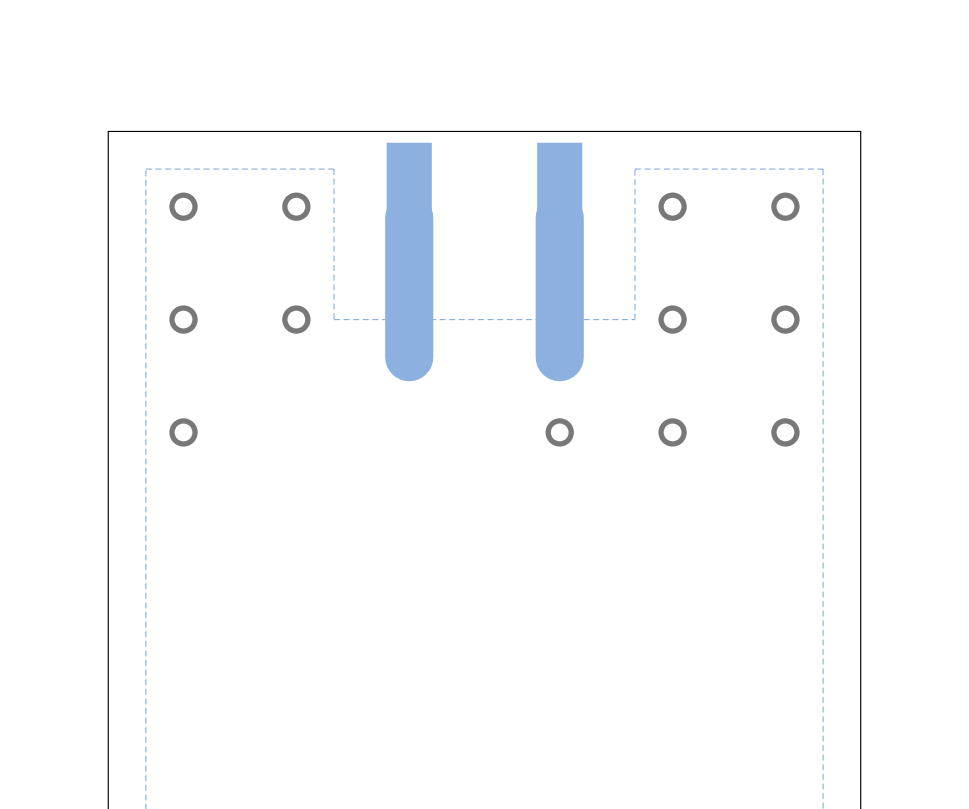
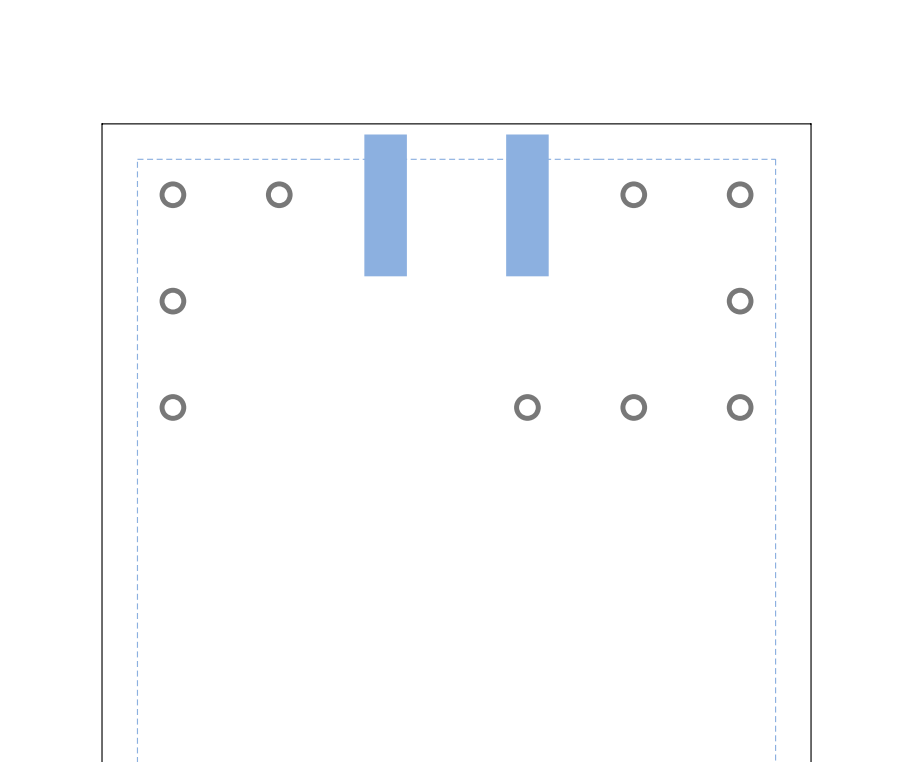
zone outline: (634, 169) (634, 319) (333, 319) (333, 169) -> (598, 159) (314, 159)
track: (409, 217) (409, 357) -> none
track: (559, 217) (559, 357) -> none
via: (296, 319) -> none
via: (672, 319) -> none

